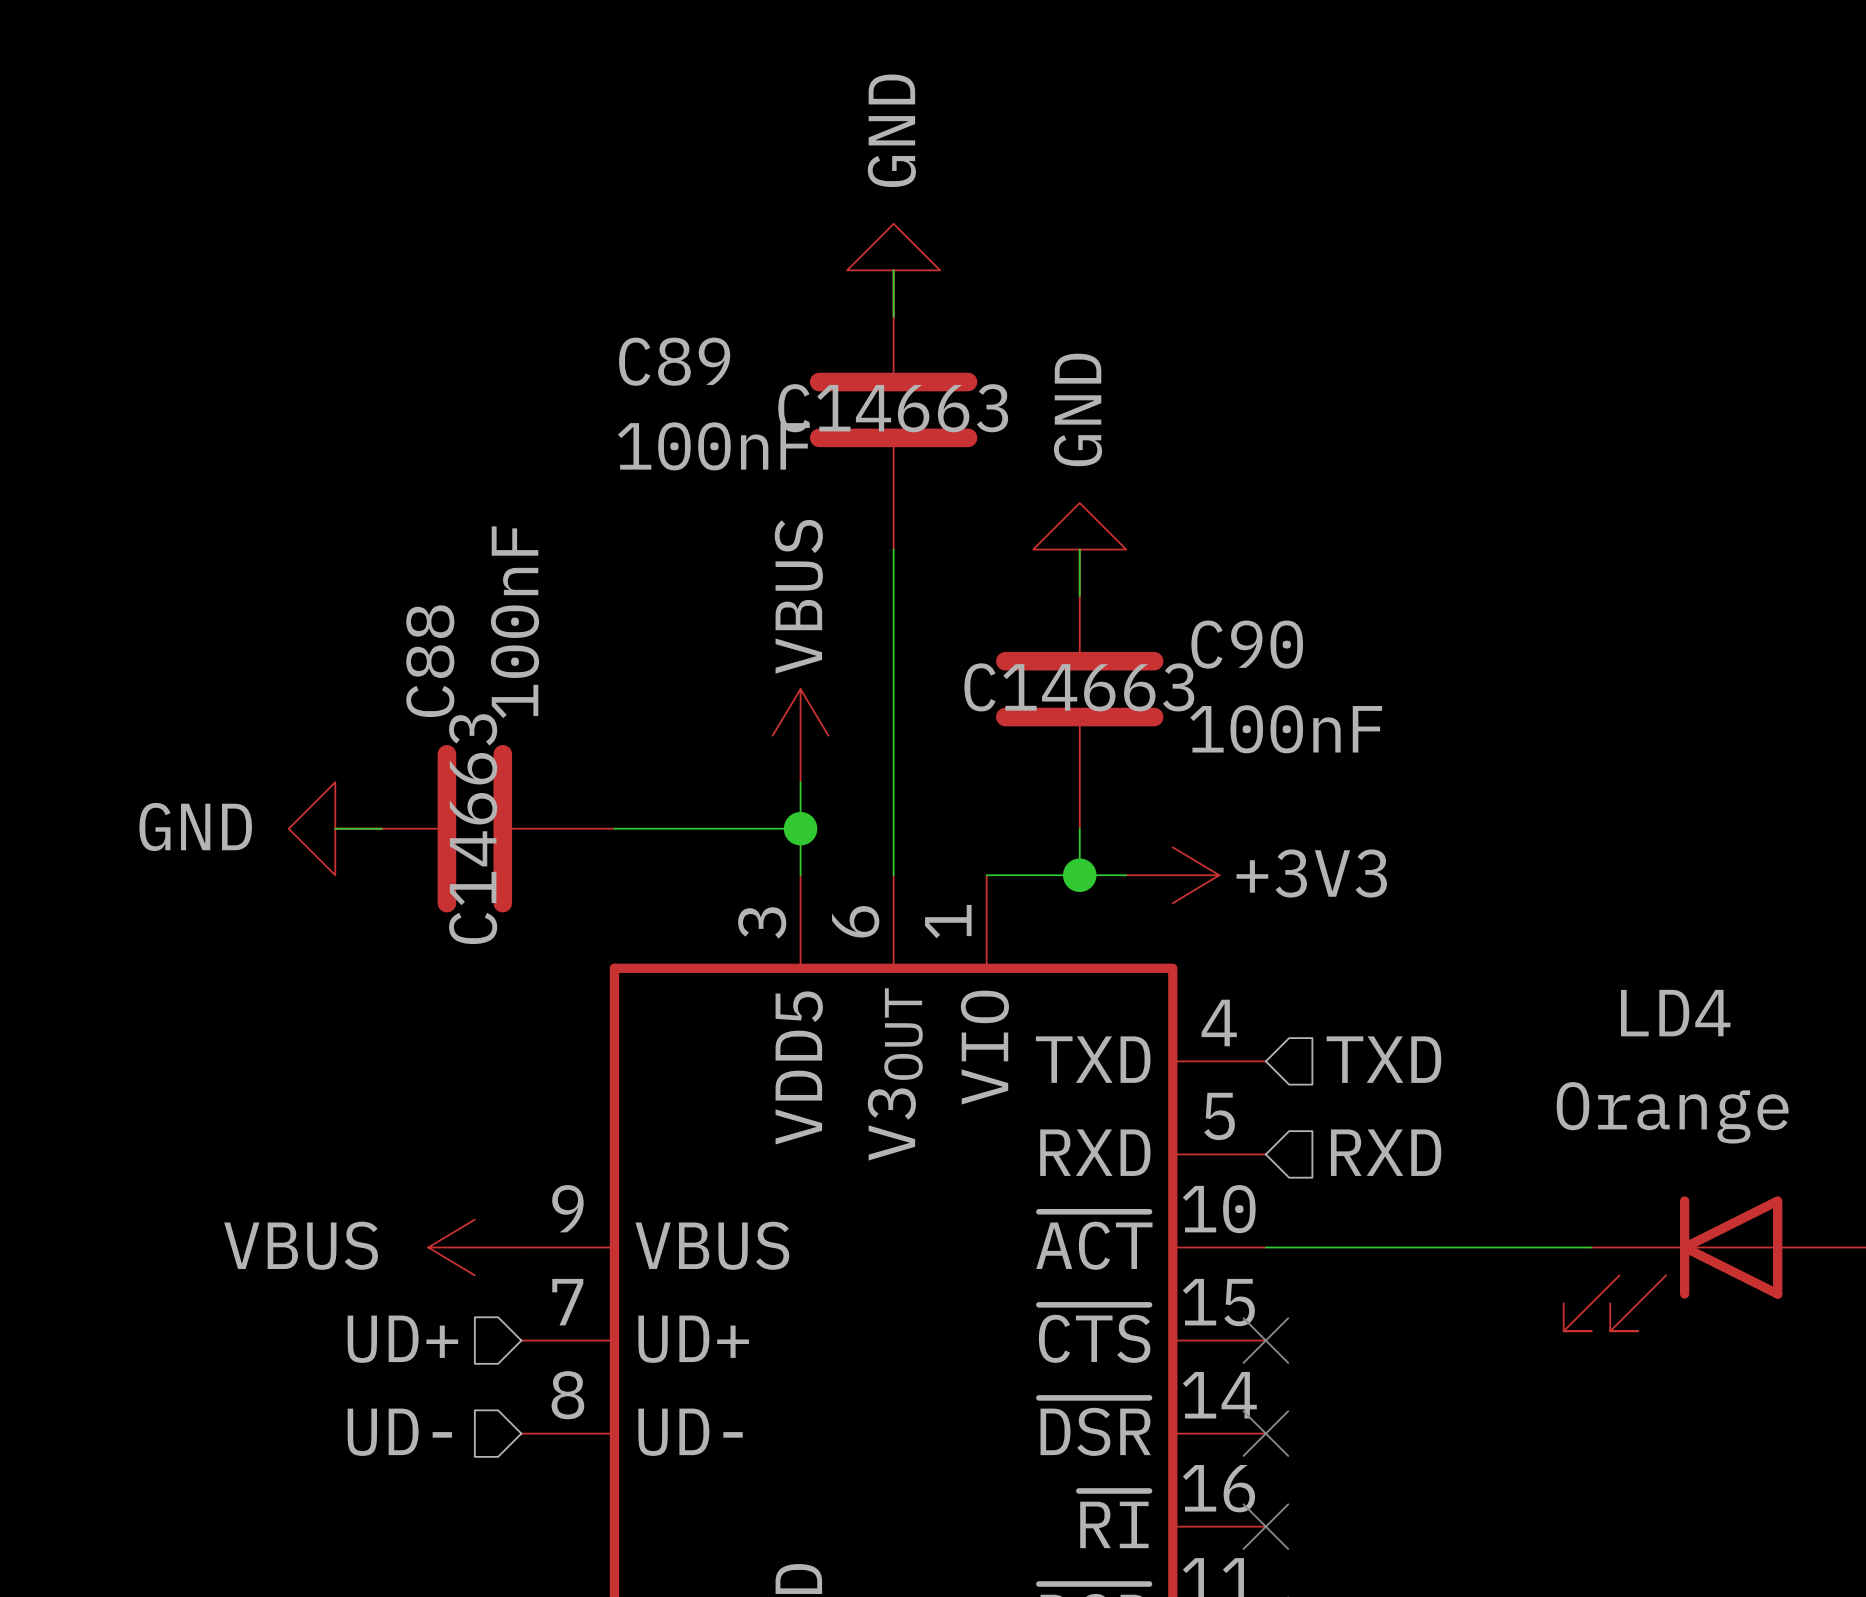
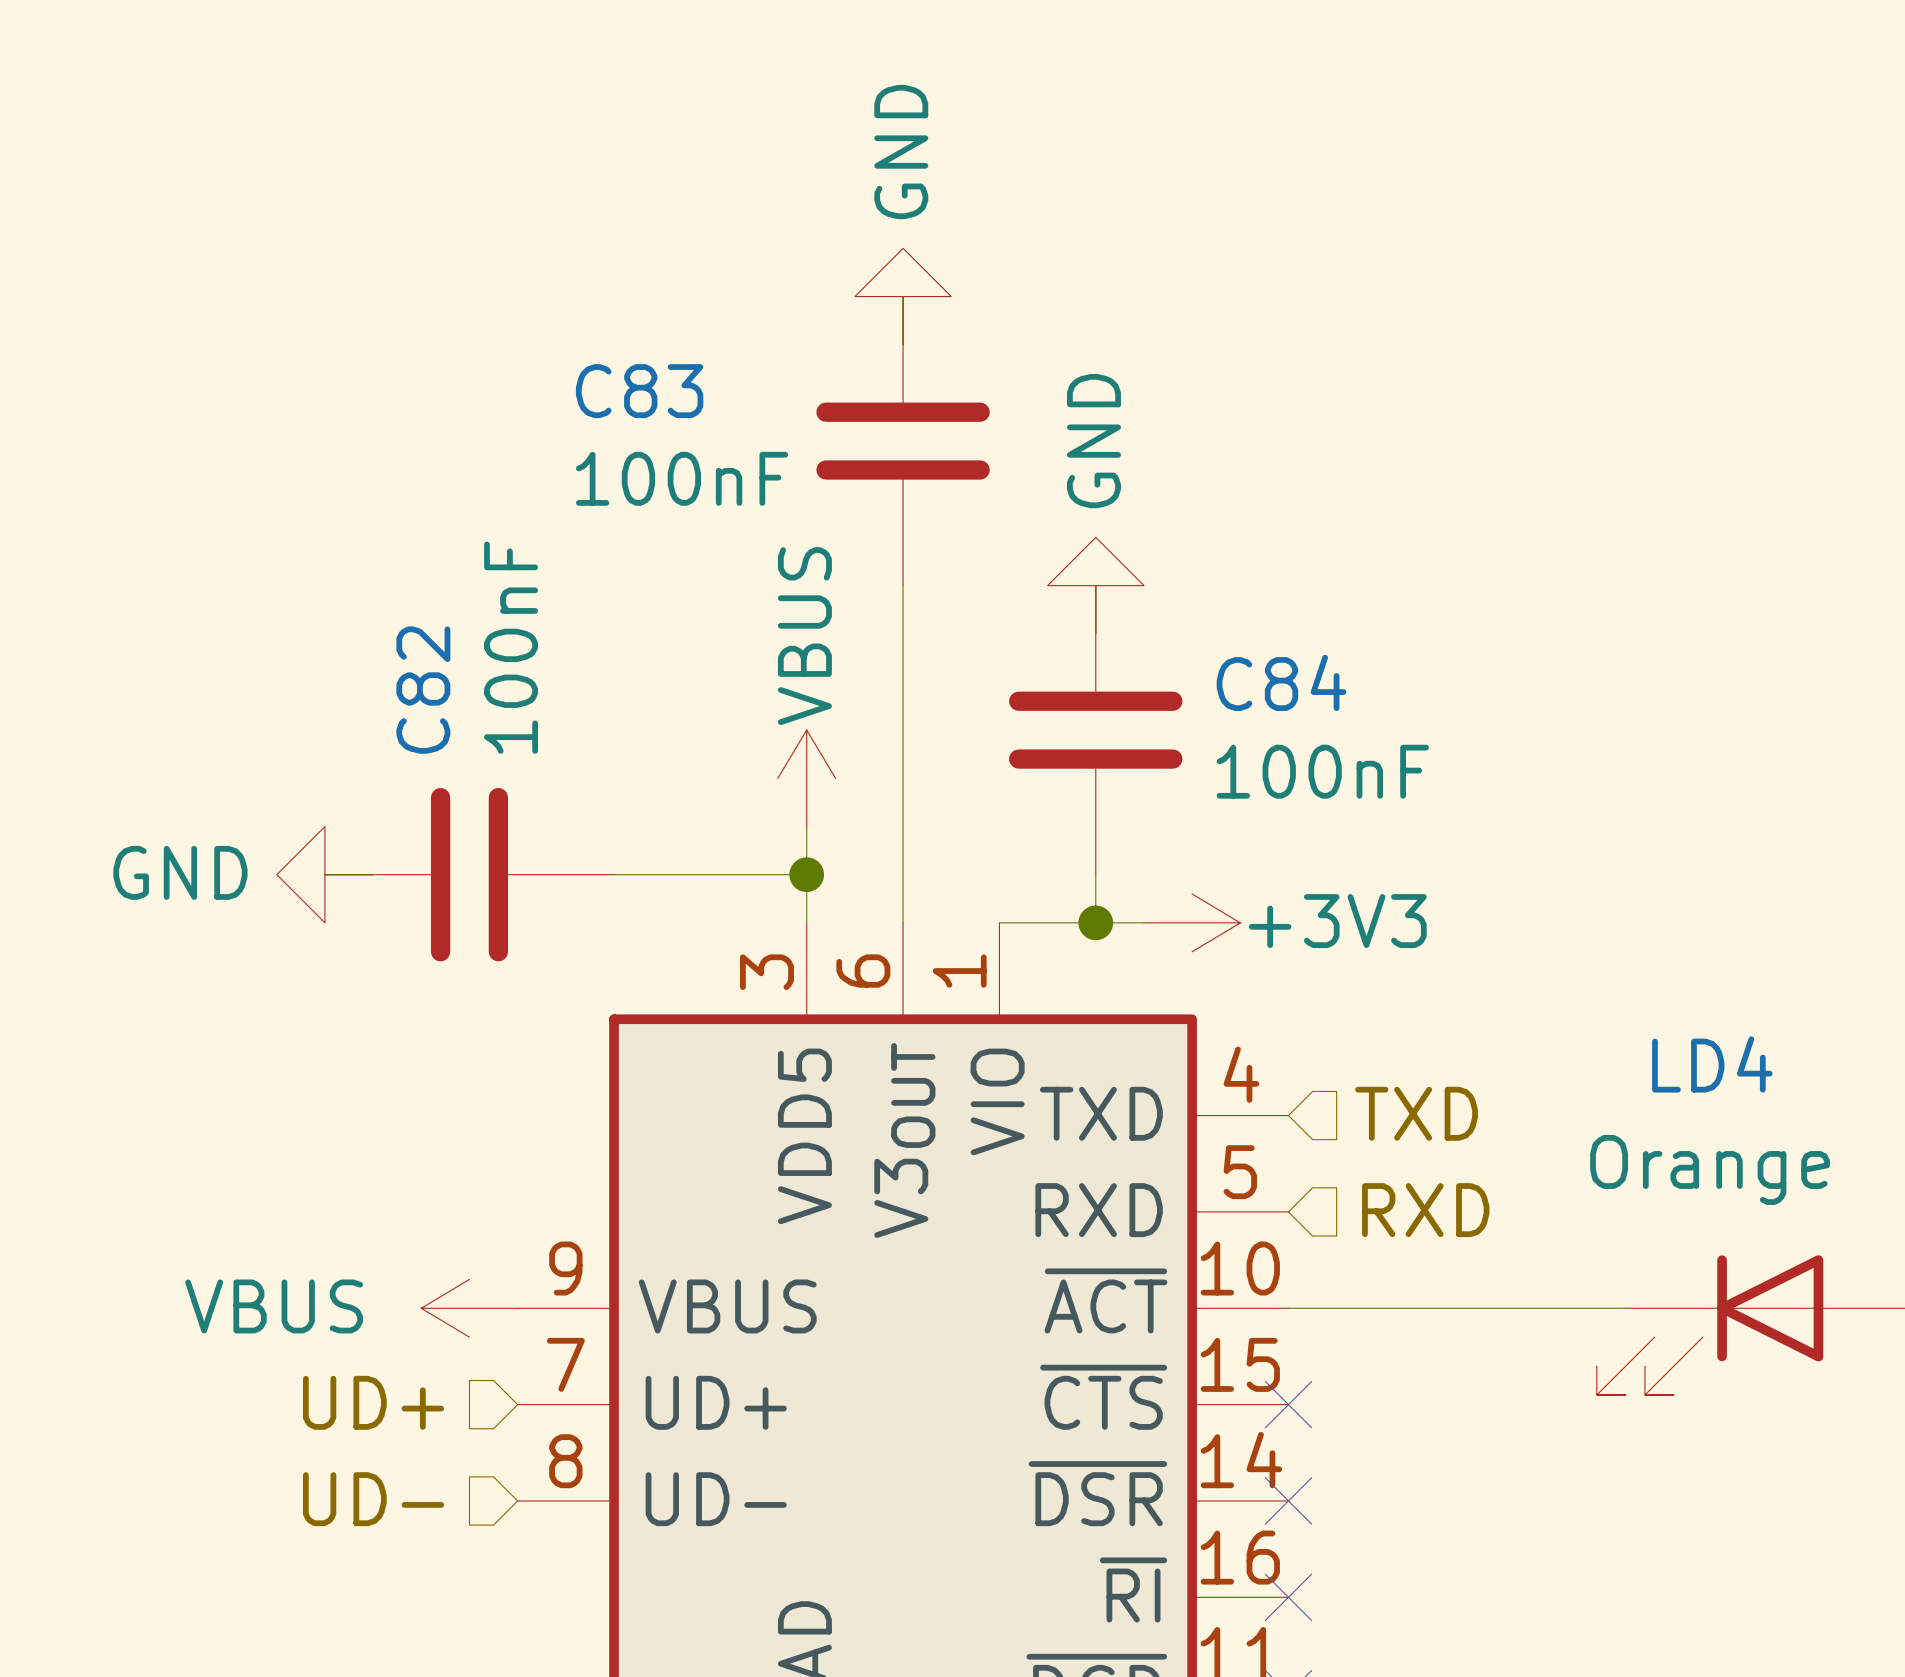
C89 name: C89 (674, 361) -> C83 (639, 391)
C89 text: C14663 (893, 408) -> none
C89 value position: 100nF (713, 446) -> 100nF (682, 478)
C90 name: C90 (1247, 644) -> C84 (1281, 682)
C88 name: C88 (430, 661) -> C82 (423, 690)
C90 text: C14663 (1079, 687) -> none
C88 text: C14663 (473, 829) -> none

